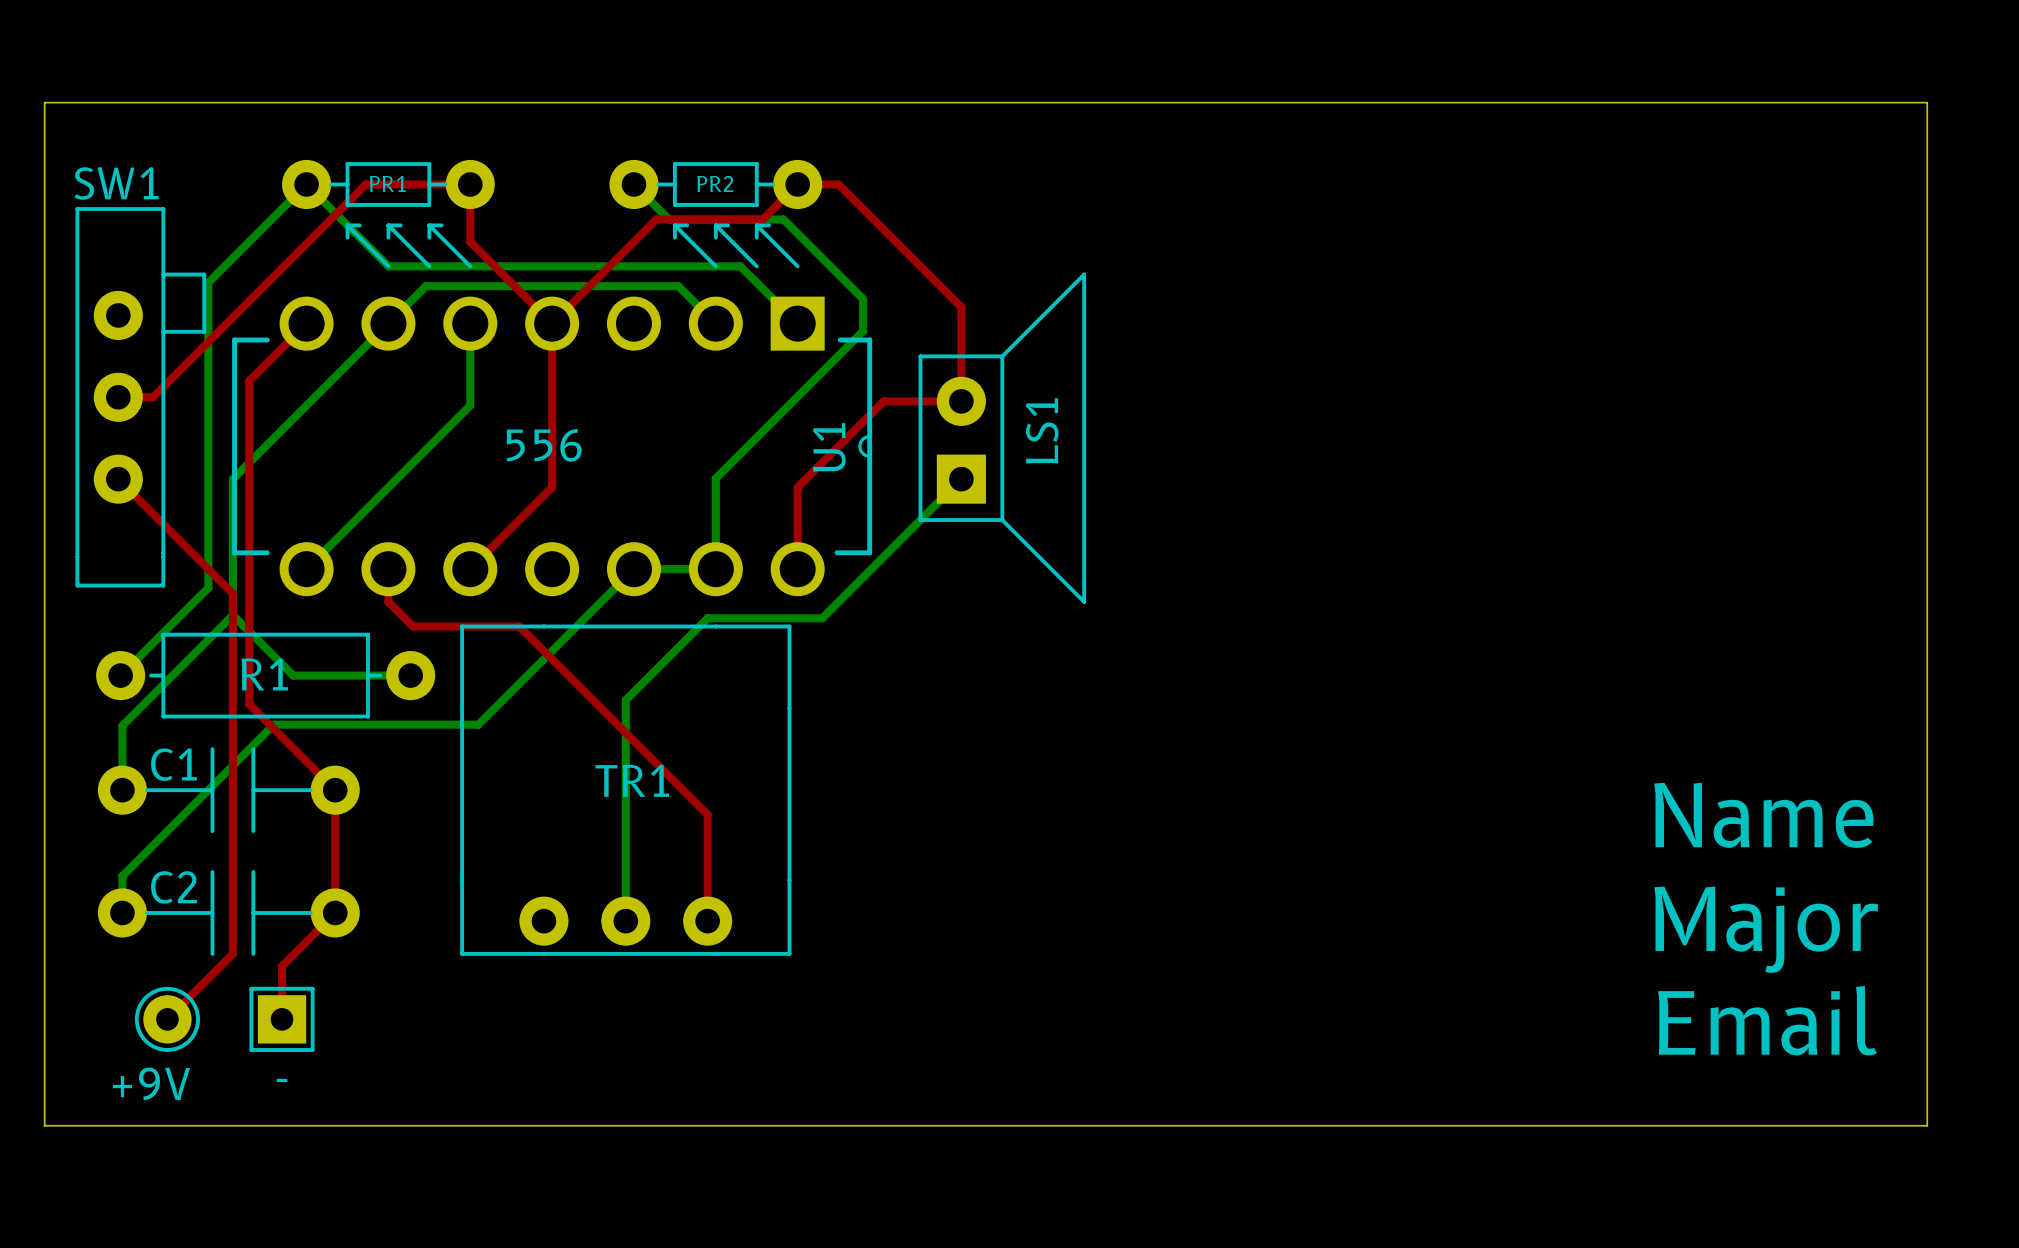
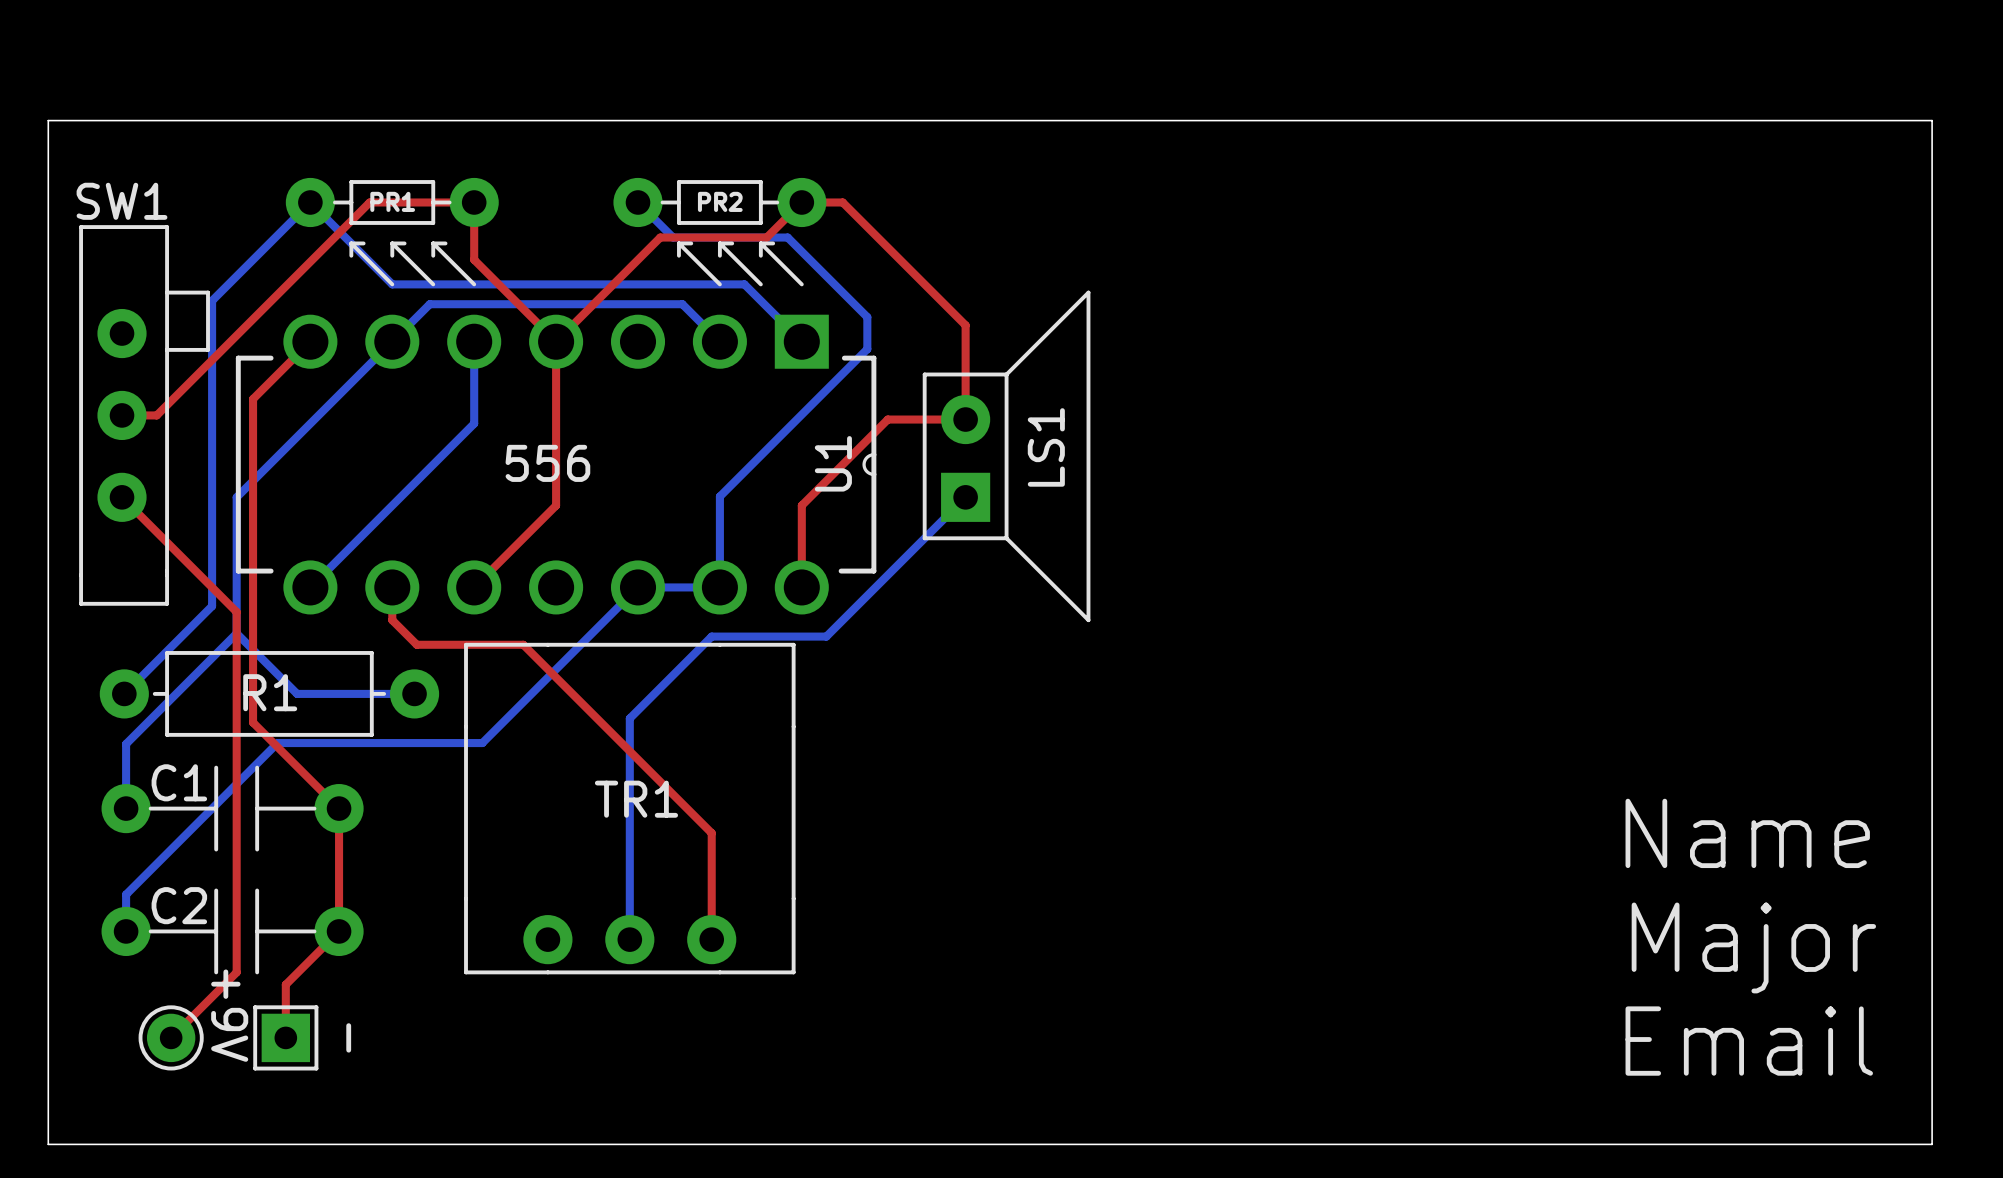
part name rotation: 0° (282, 1080) -> 90° clockwise (348, 1037)
part name position: - (282, 1080) -> - (348, 1037)
+9V name rotation: 0° (151, 1083) -> 90° clockwise (229, 1015)

